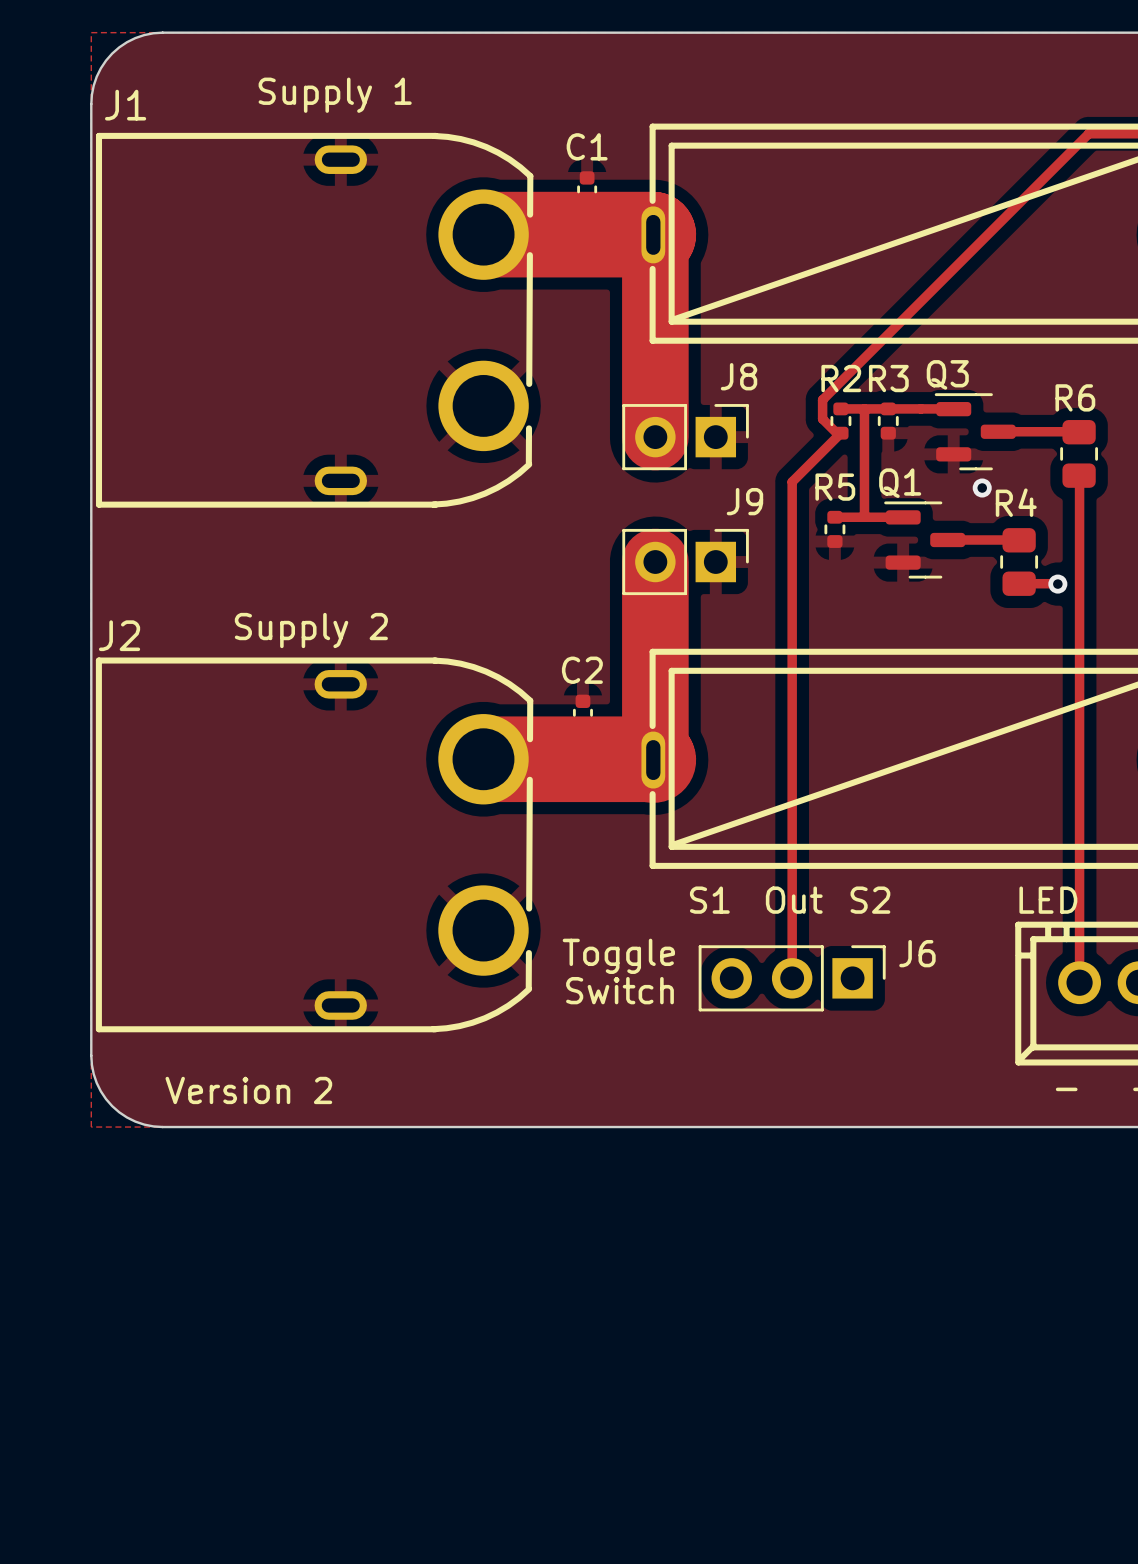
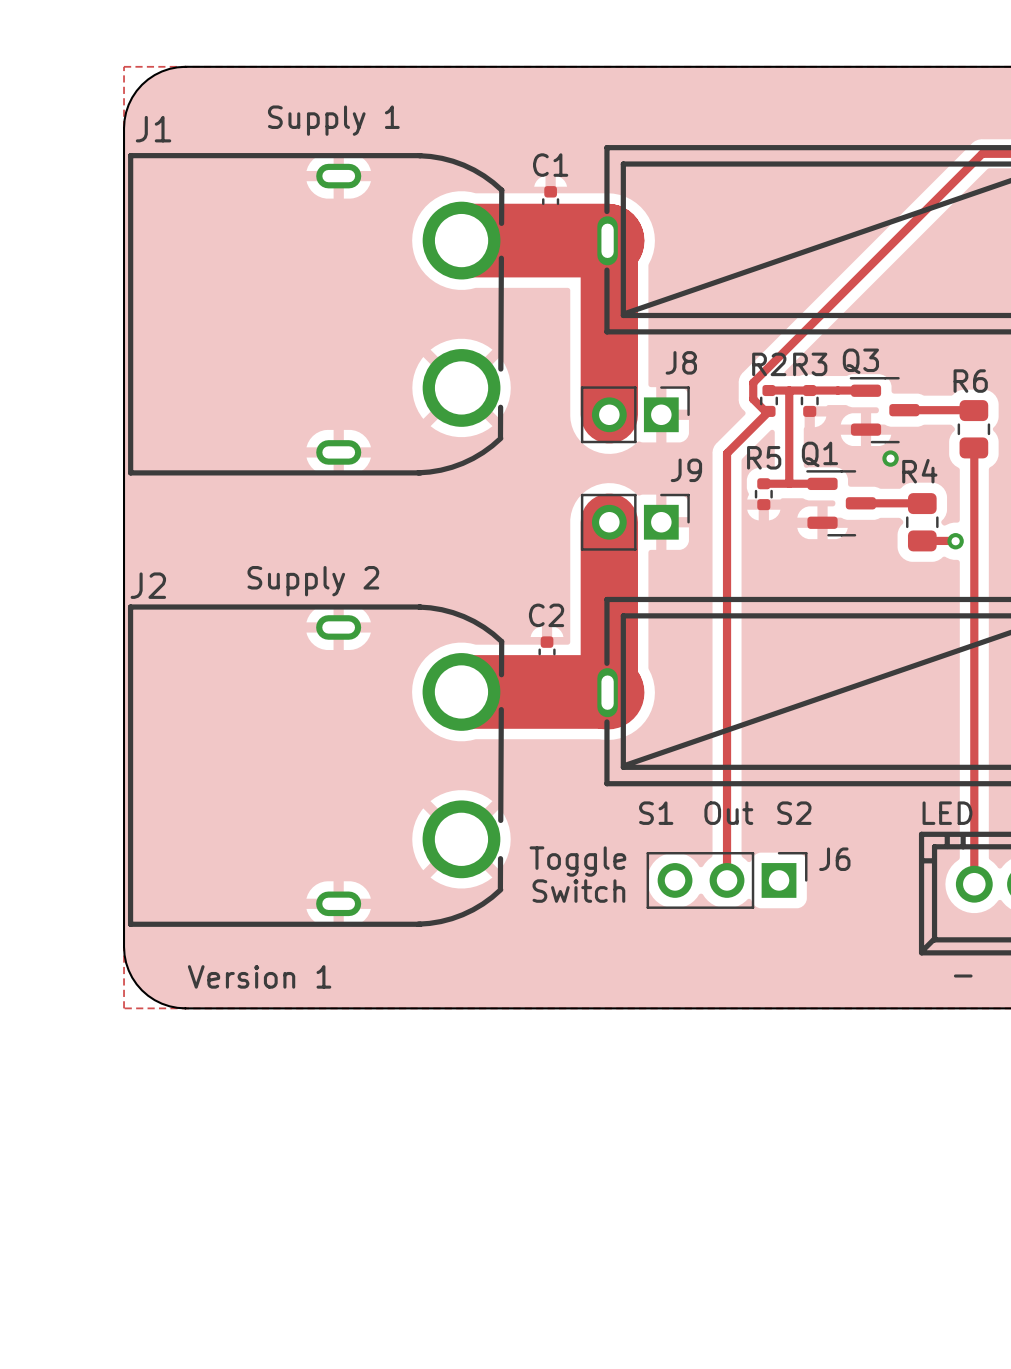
text: Version 2 (248, 1090) -> Version 1 (259, 976)

